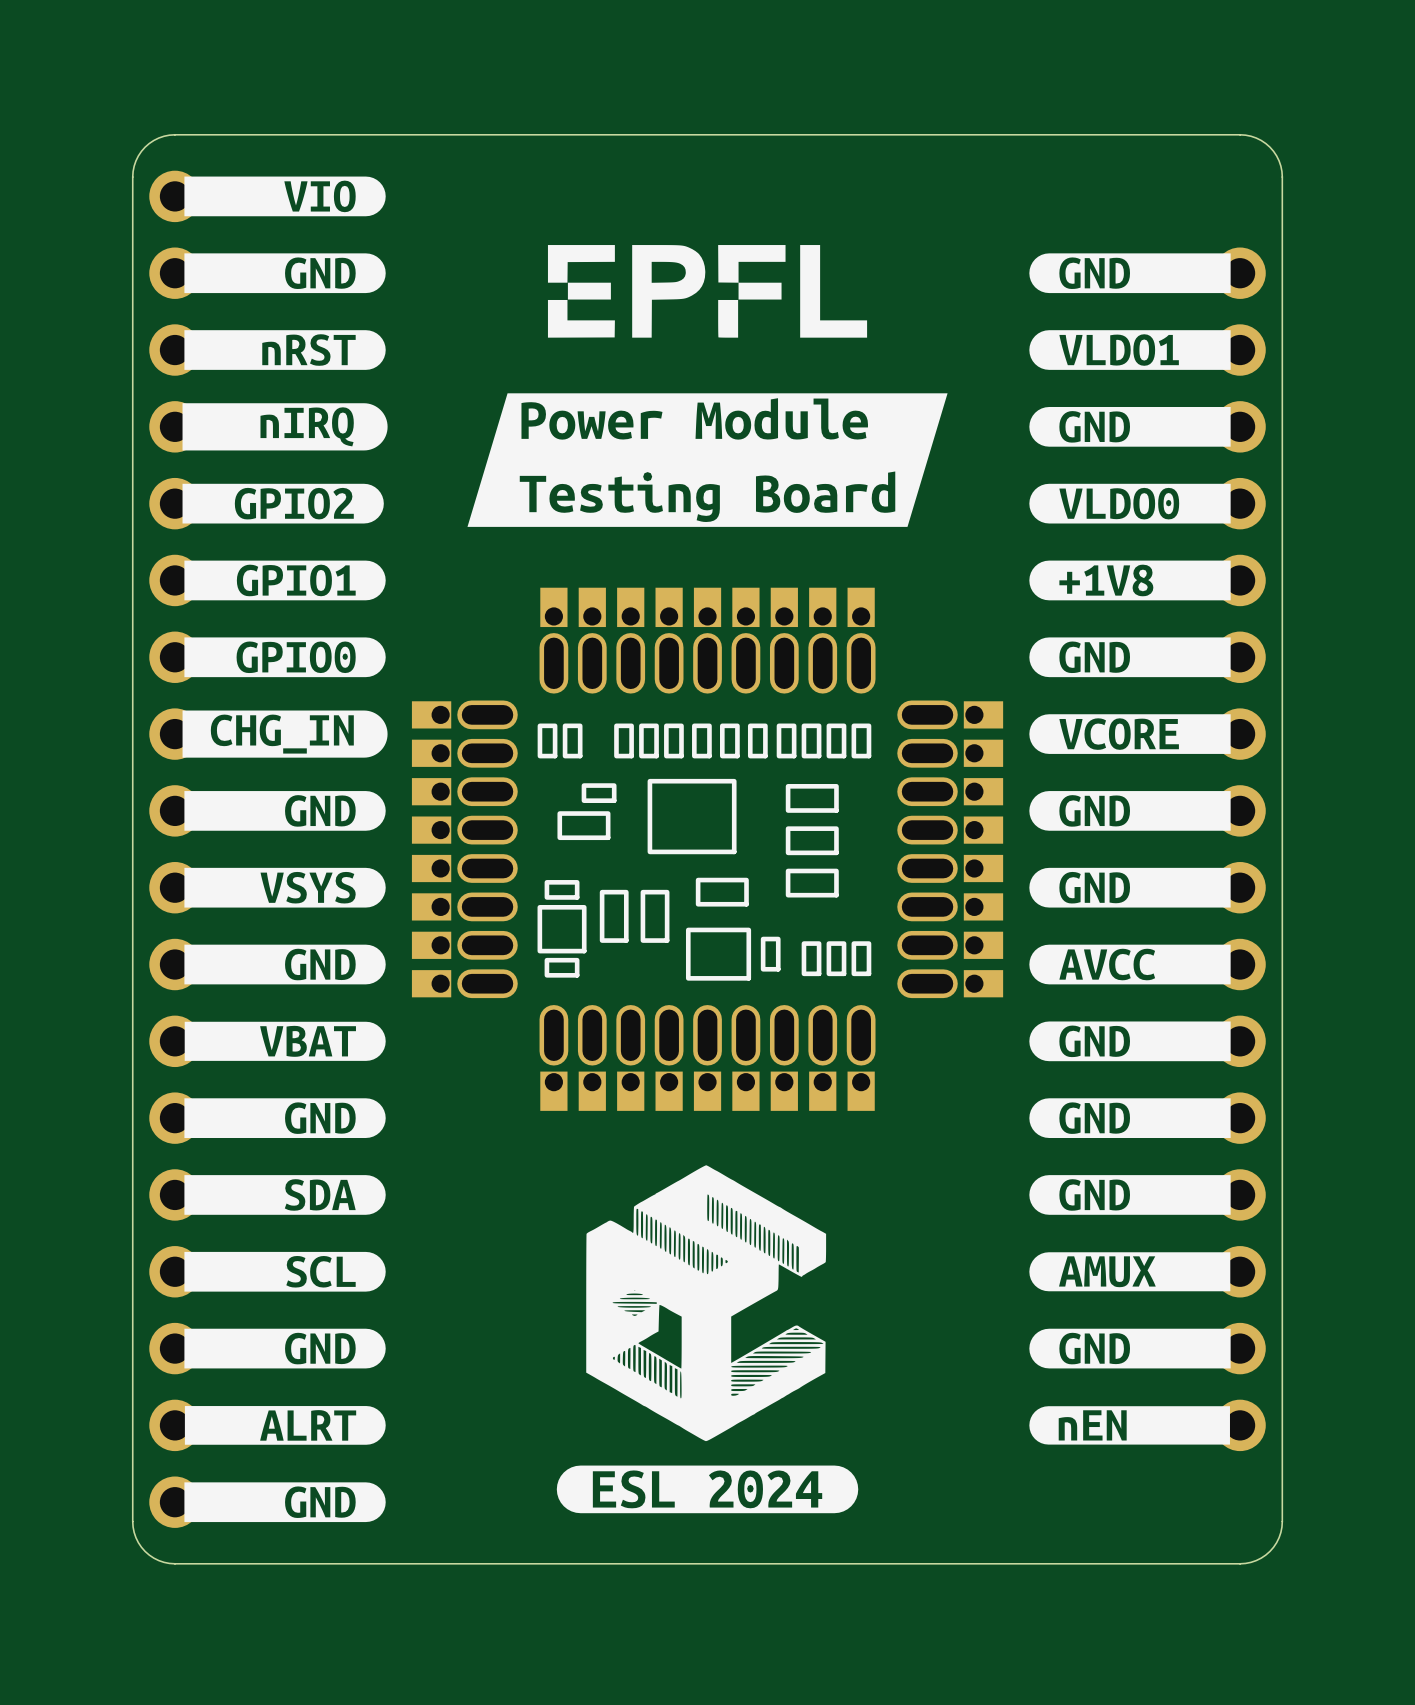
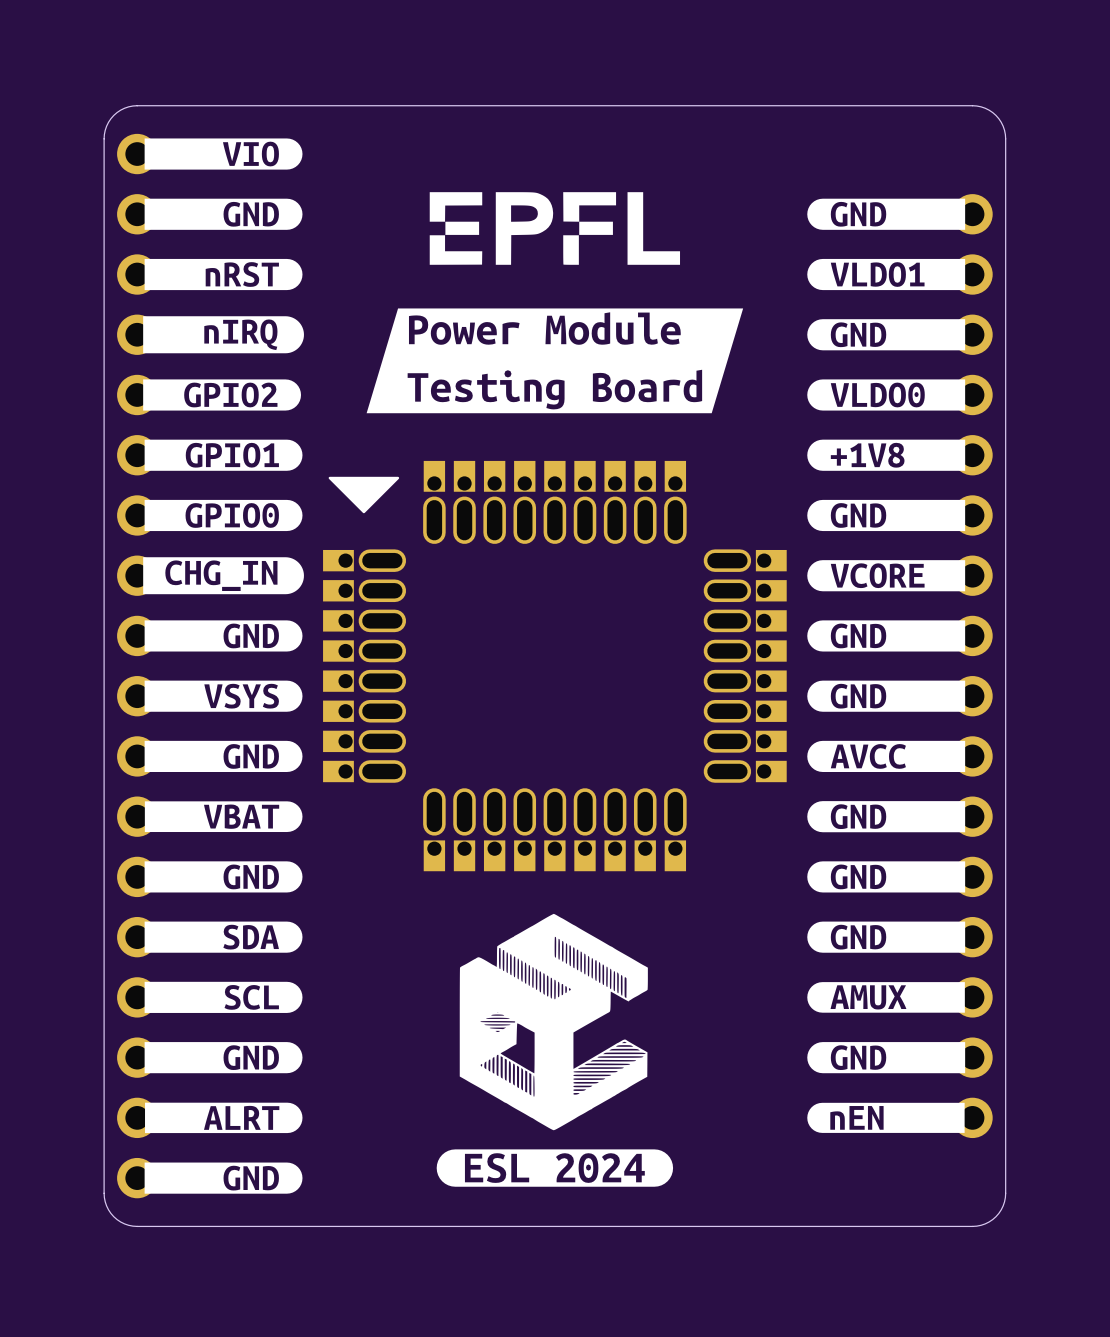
part footprint: [411, 587, 1004, 1111] -> [323, 460, 787, 872]
drawing: none -> [328, 476, 400, 514]

